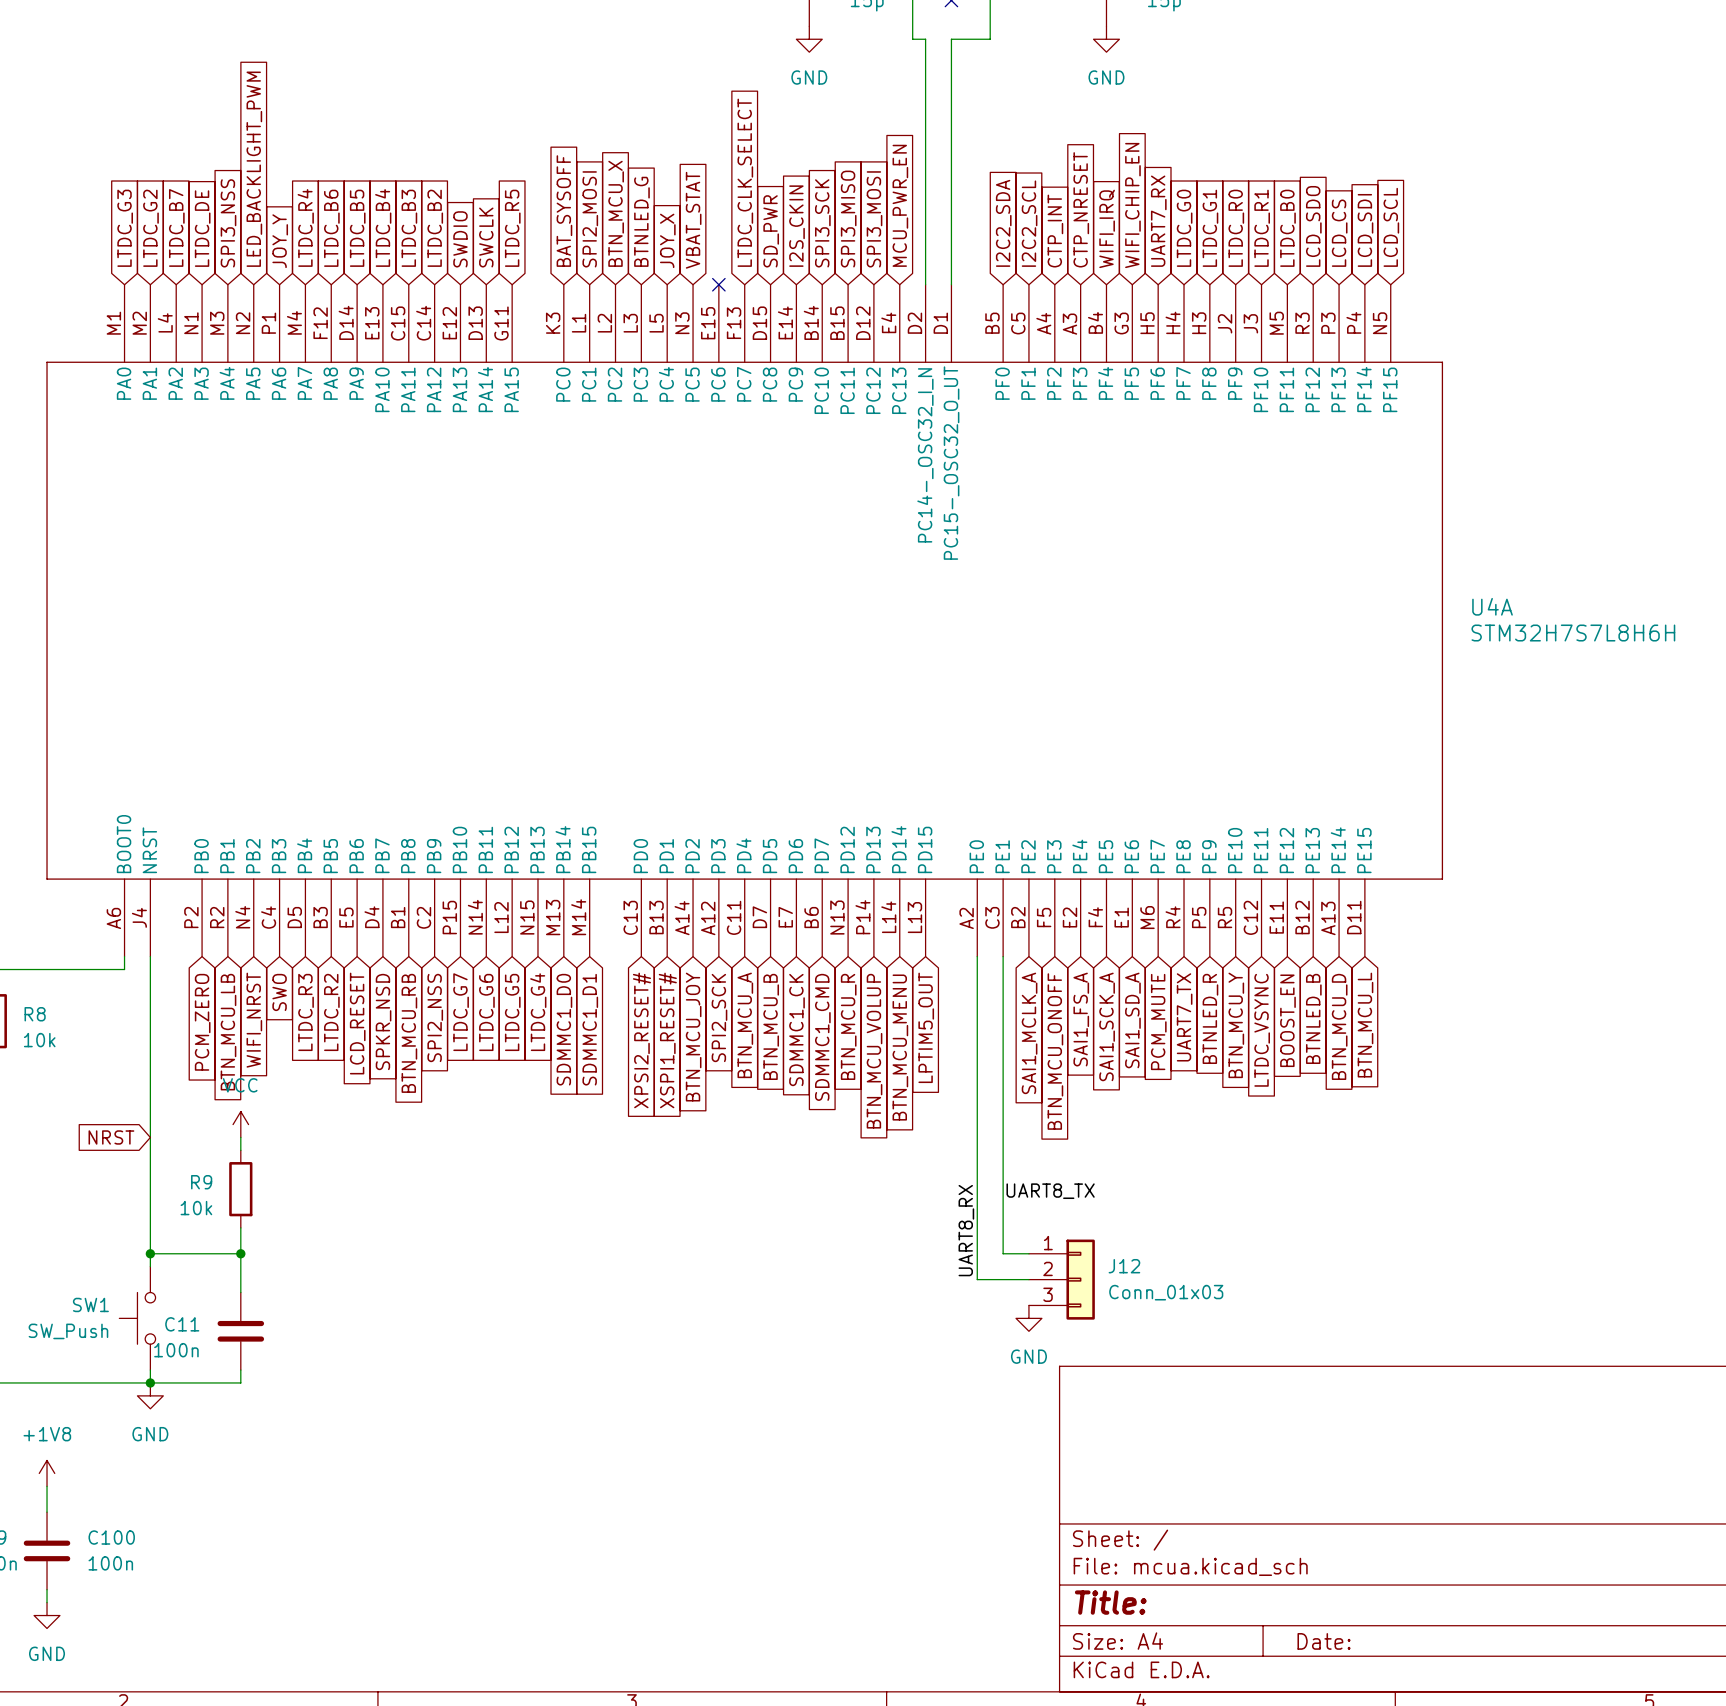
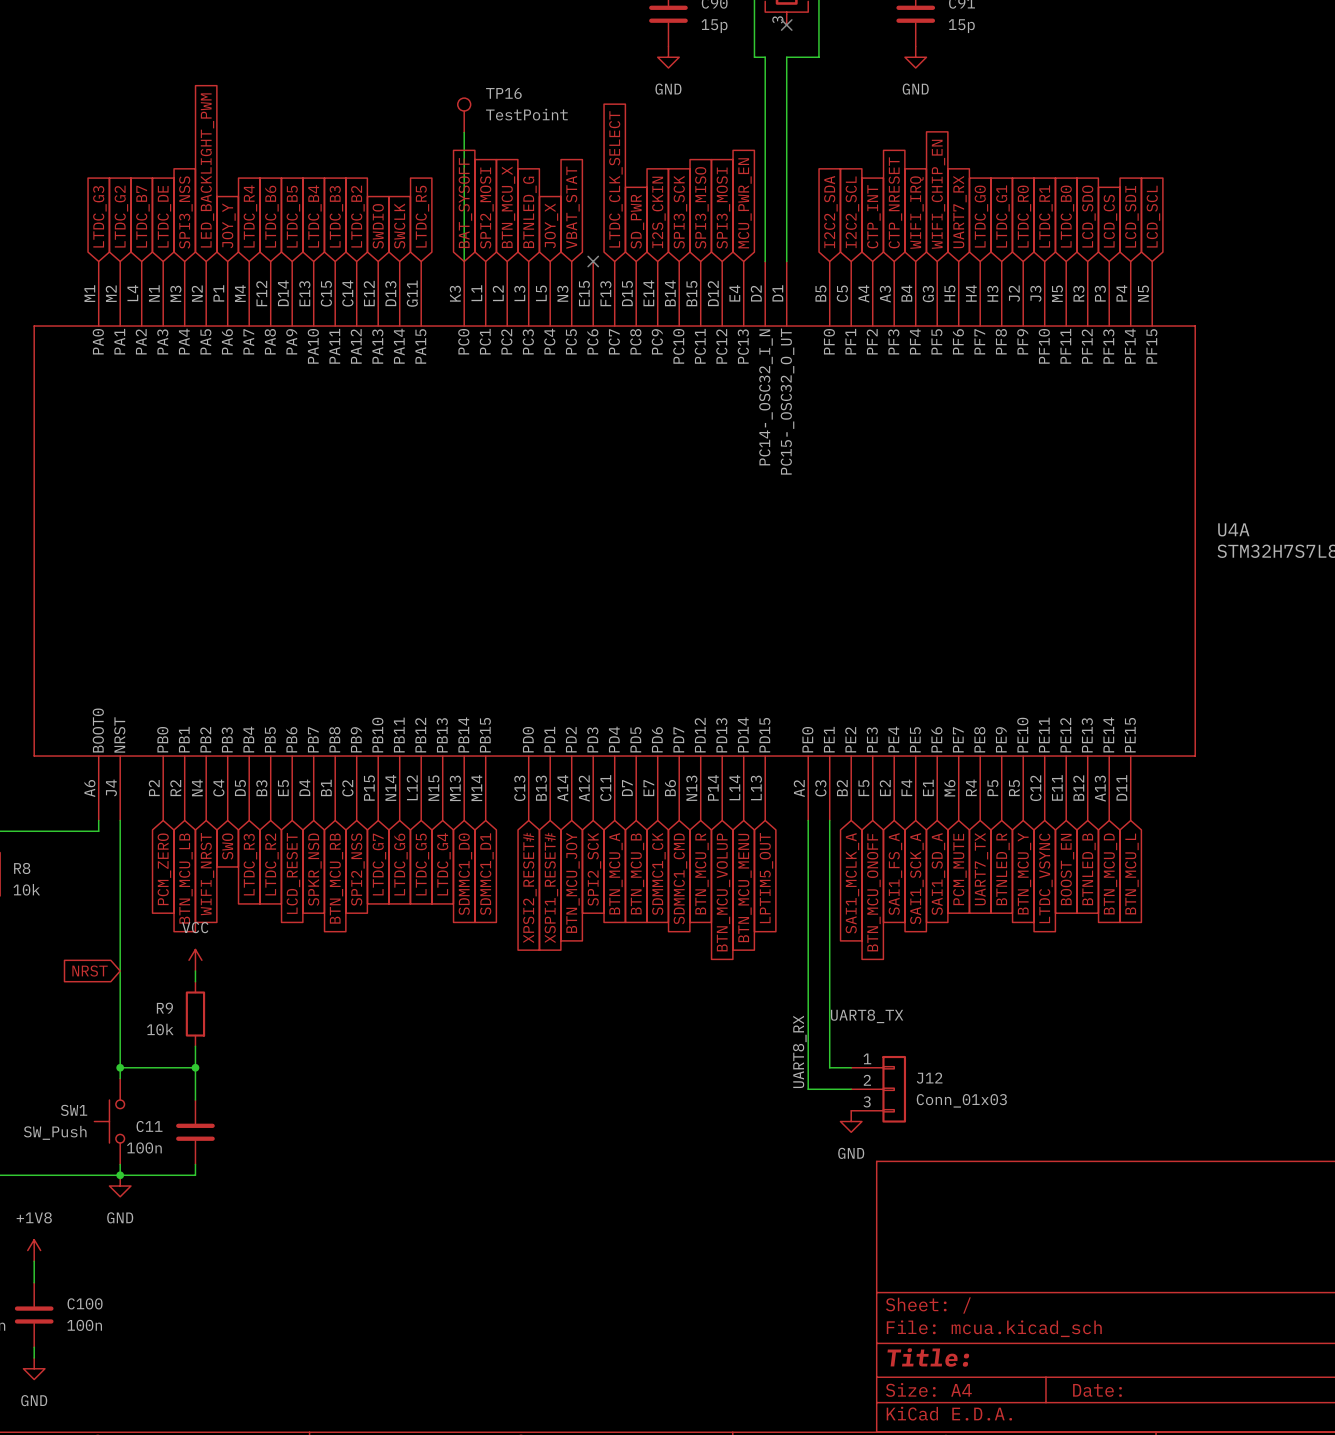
TP16: none -> TestPoint (464, 115)
wire: none -> (464, 132) (464, 261)

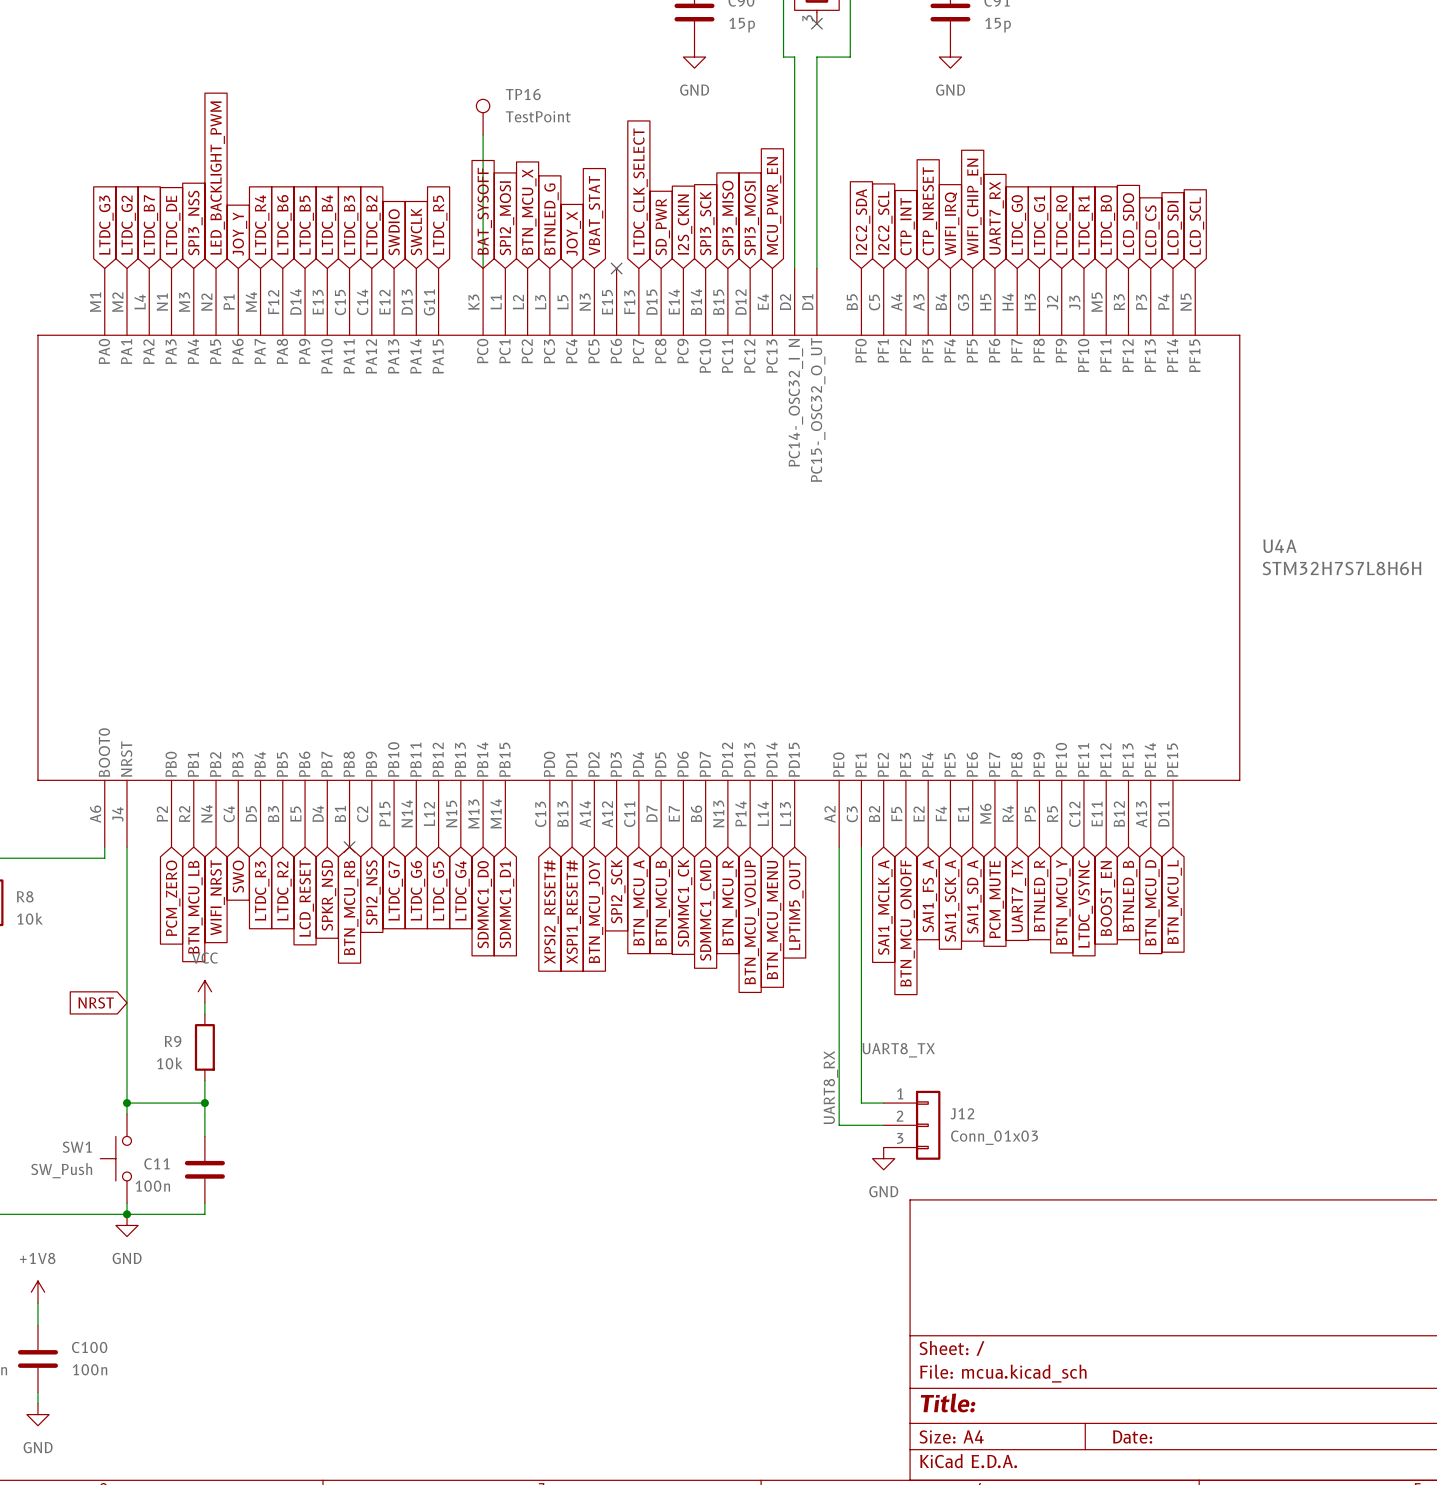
no-connect mark: none -> (349, 847)

